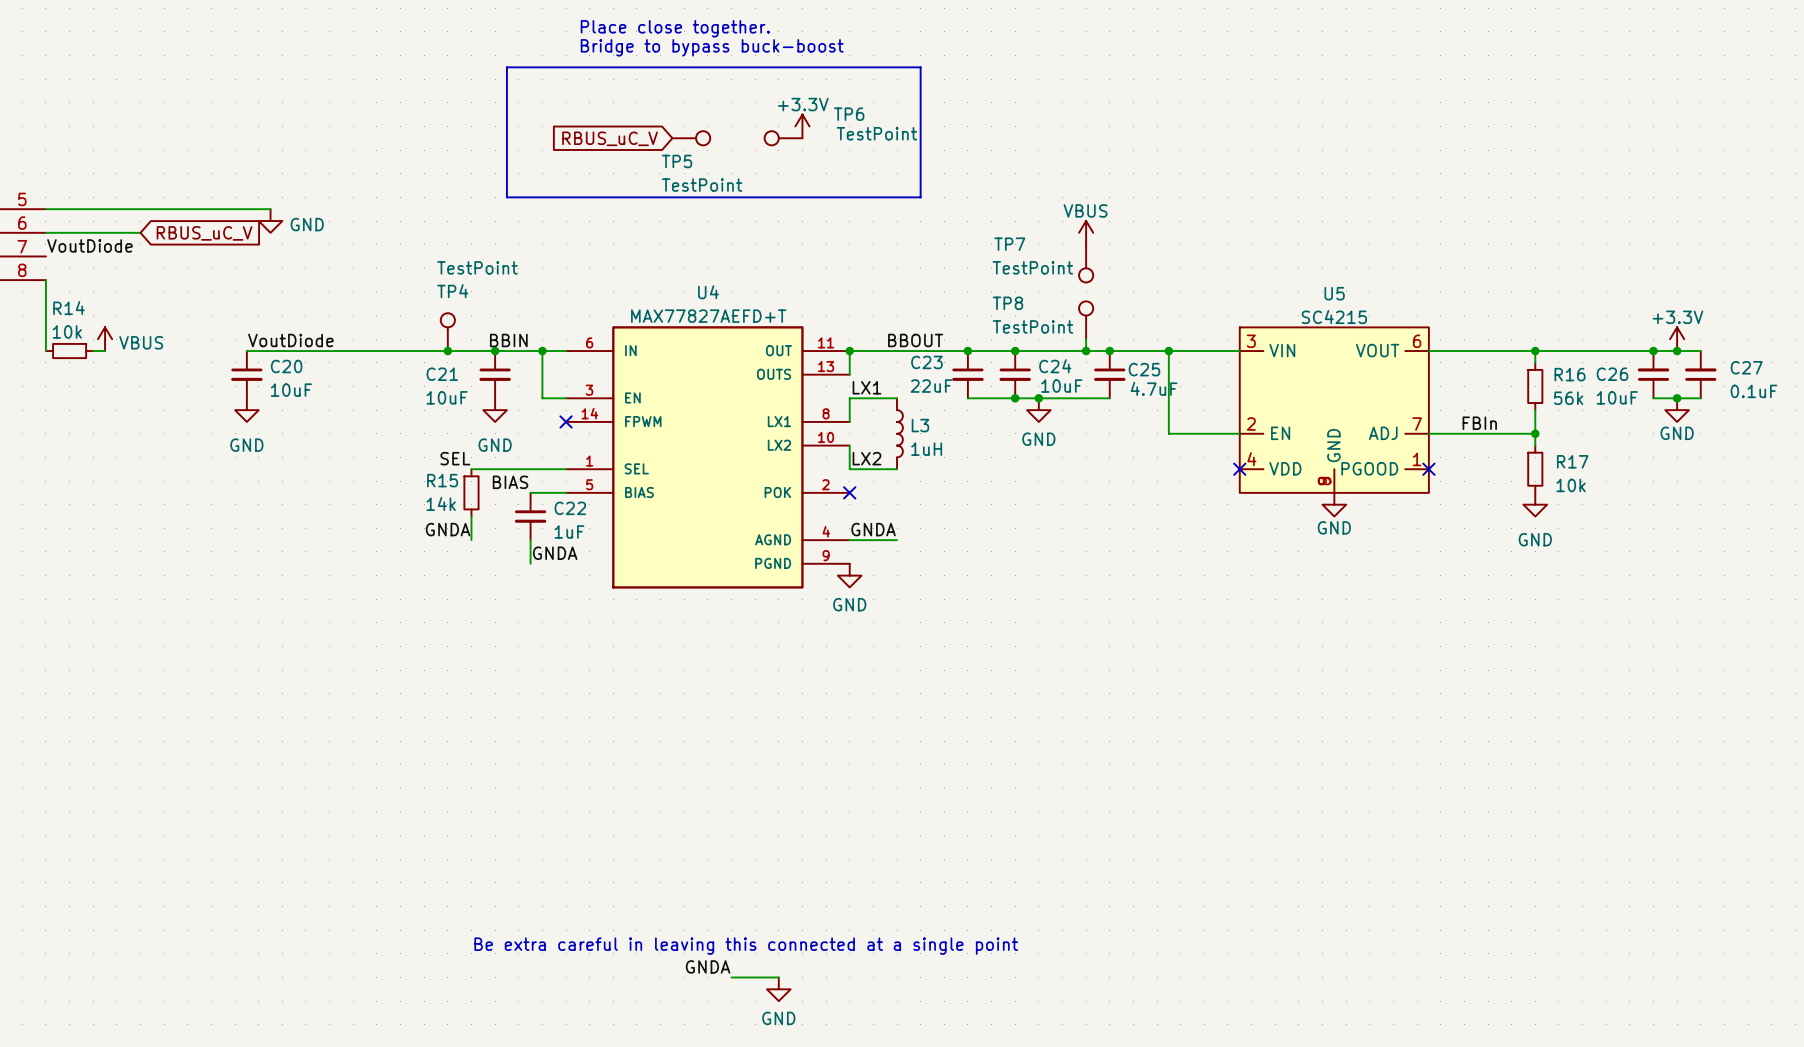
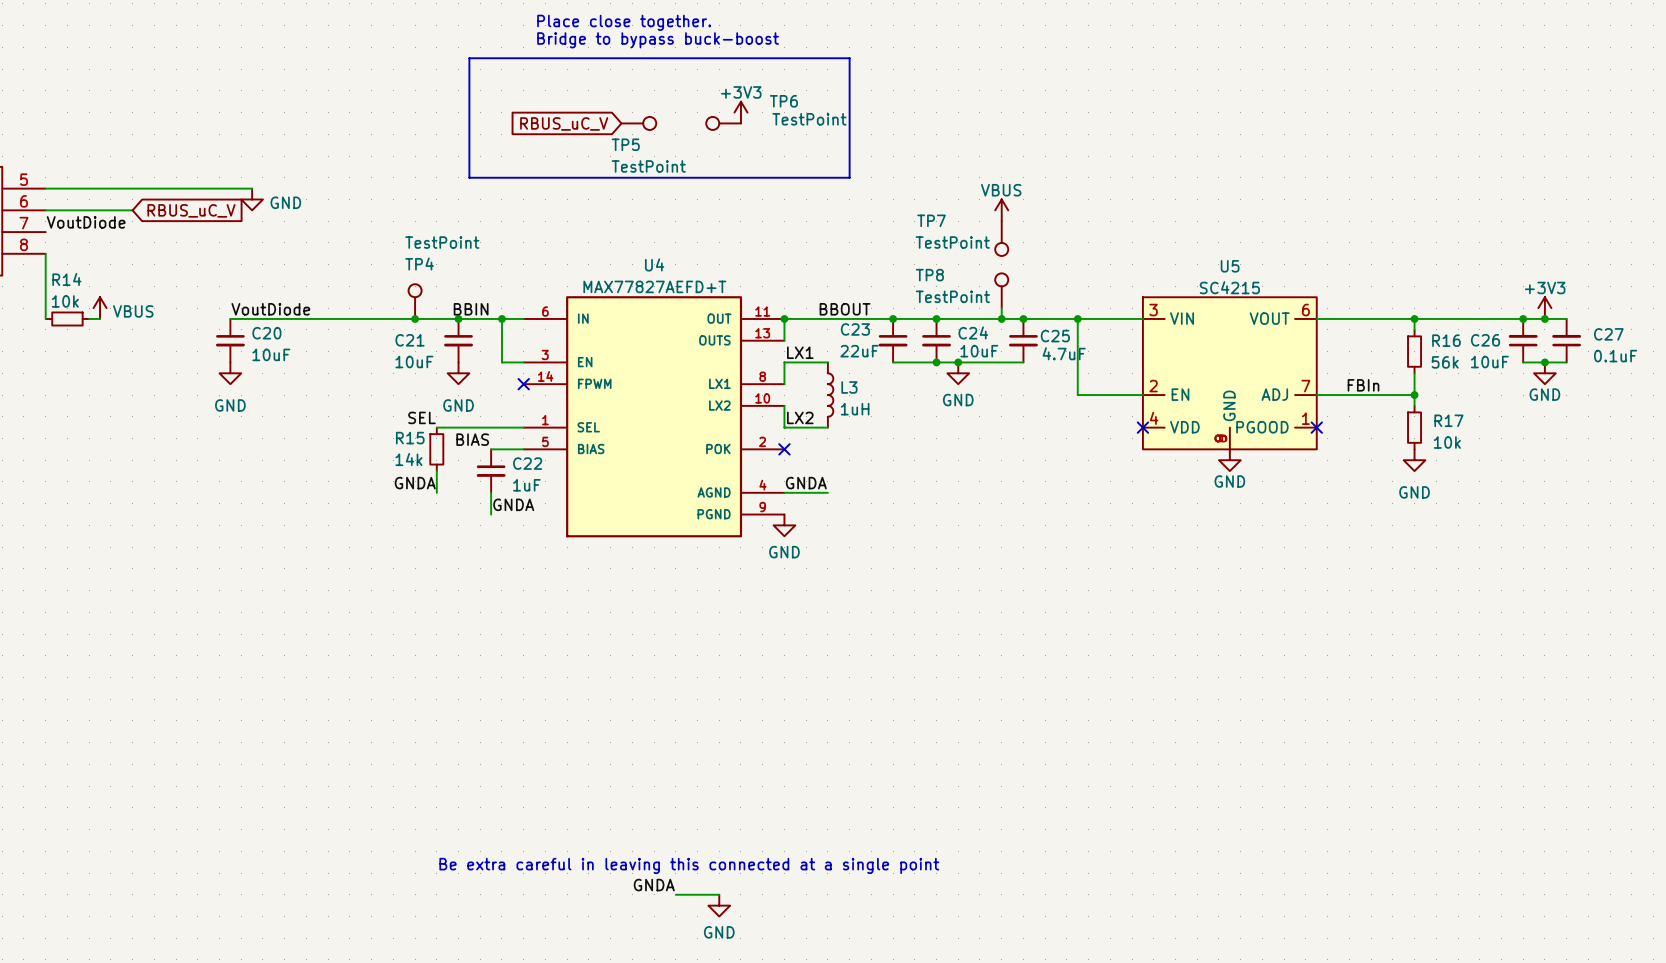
power symbol: +3.3V (802, 126) -> +3V3 (740, 112)
power symbol: +3.3V (1677, 339) -> +3V3 (1544, 308)

